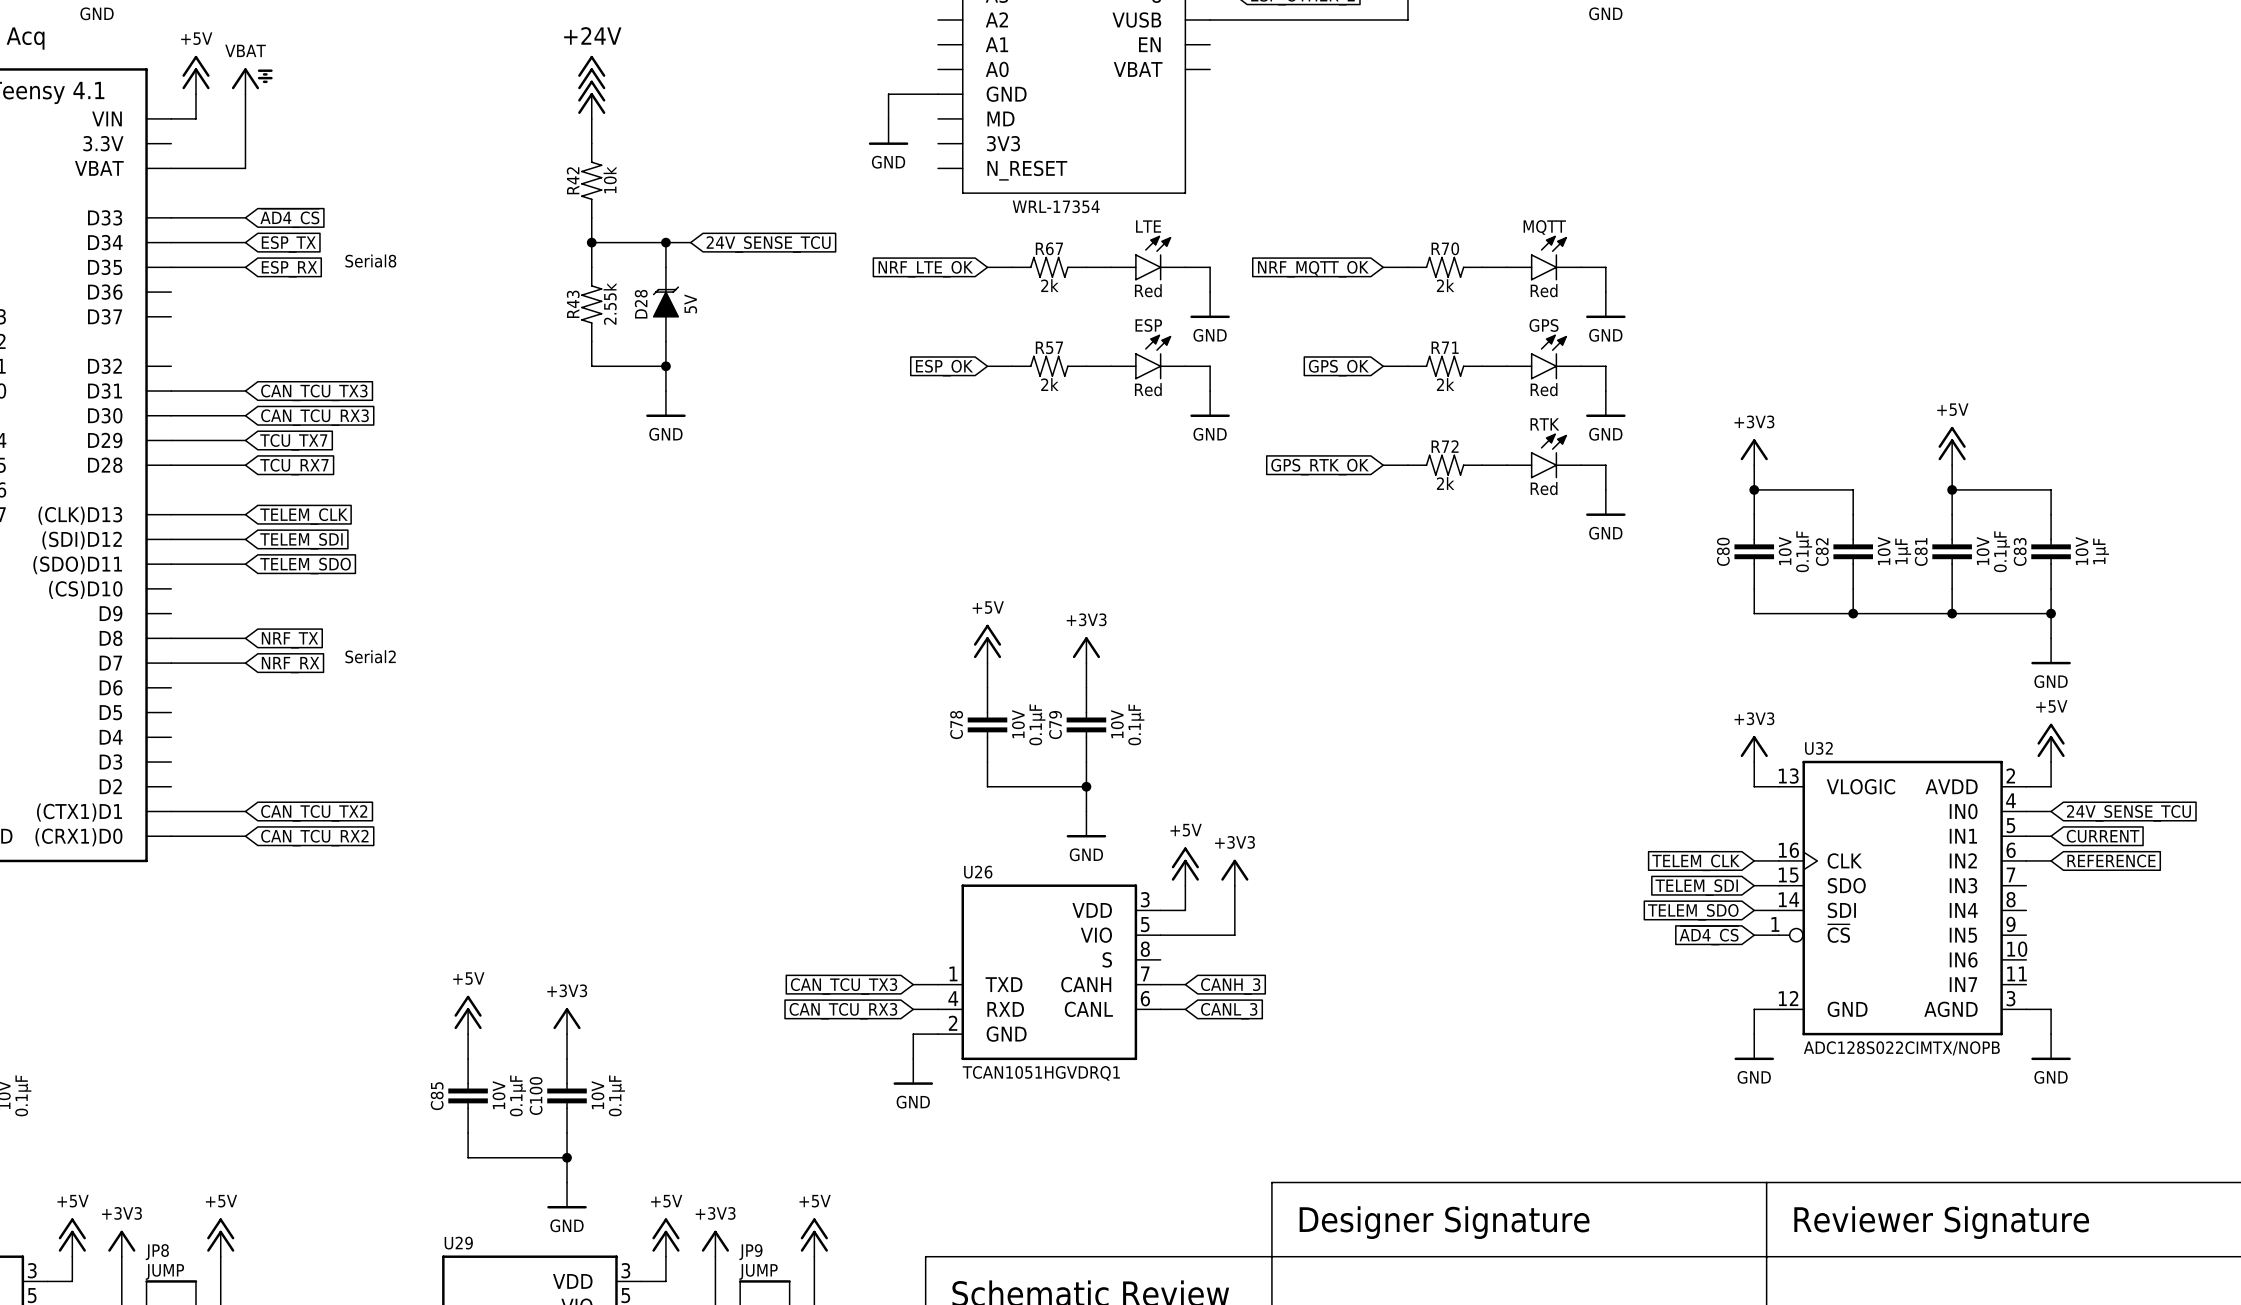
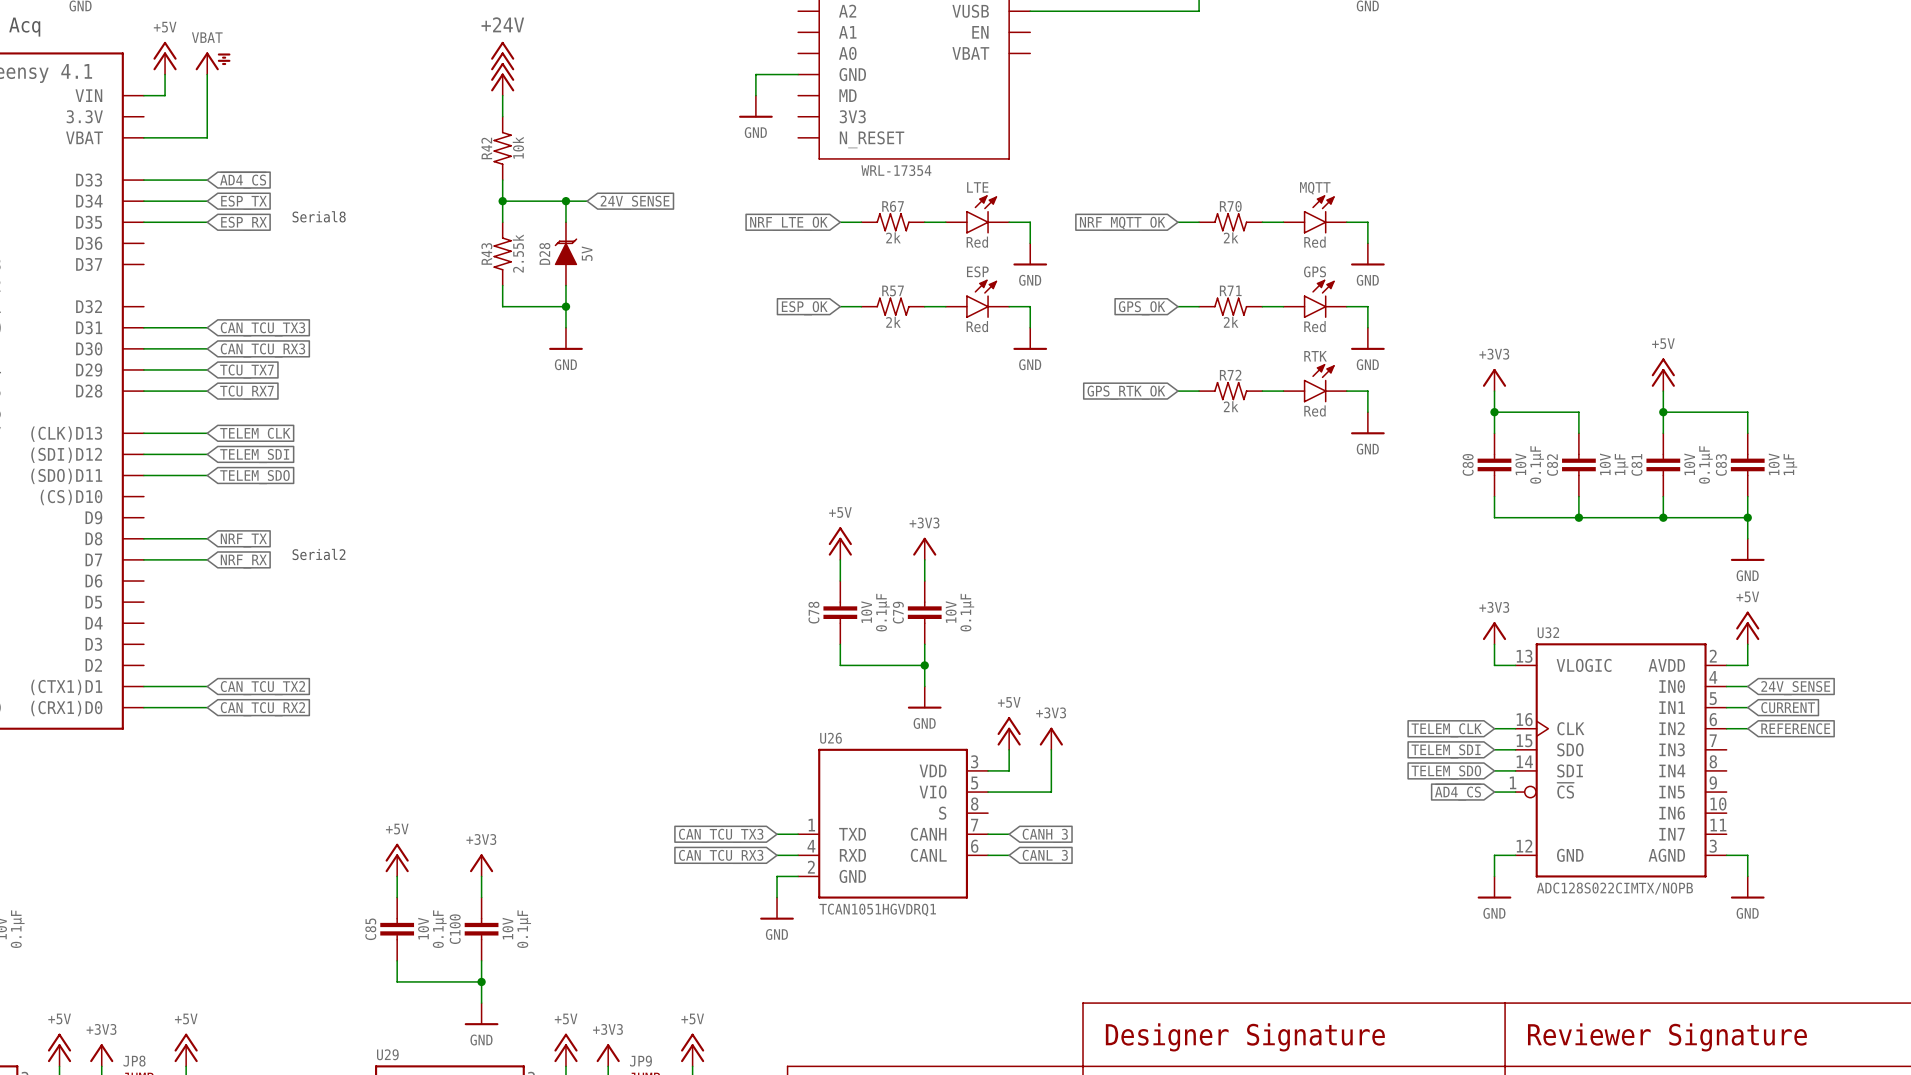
global label: 24V_SENSE_TCU (768, 244) -> 24V_SENSE (635, 202)
global label: 24V_SENSE_TCU (2129, 813) -> 24V_SENSE (1795, 688)

